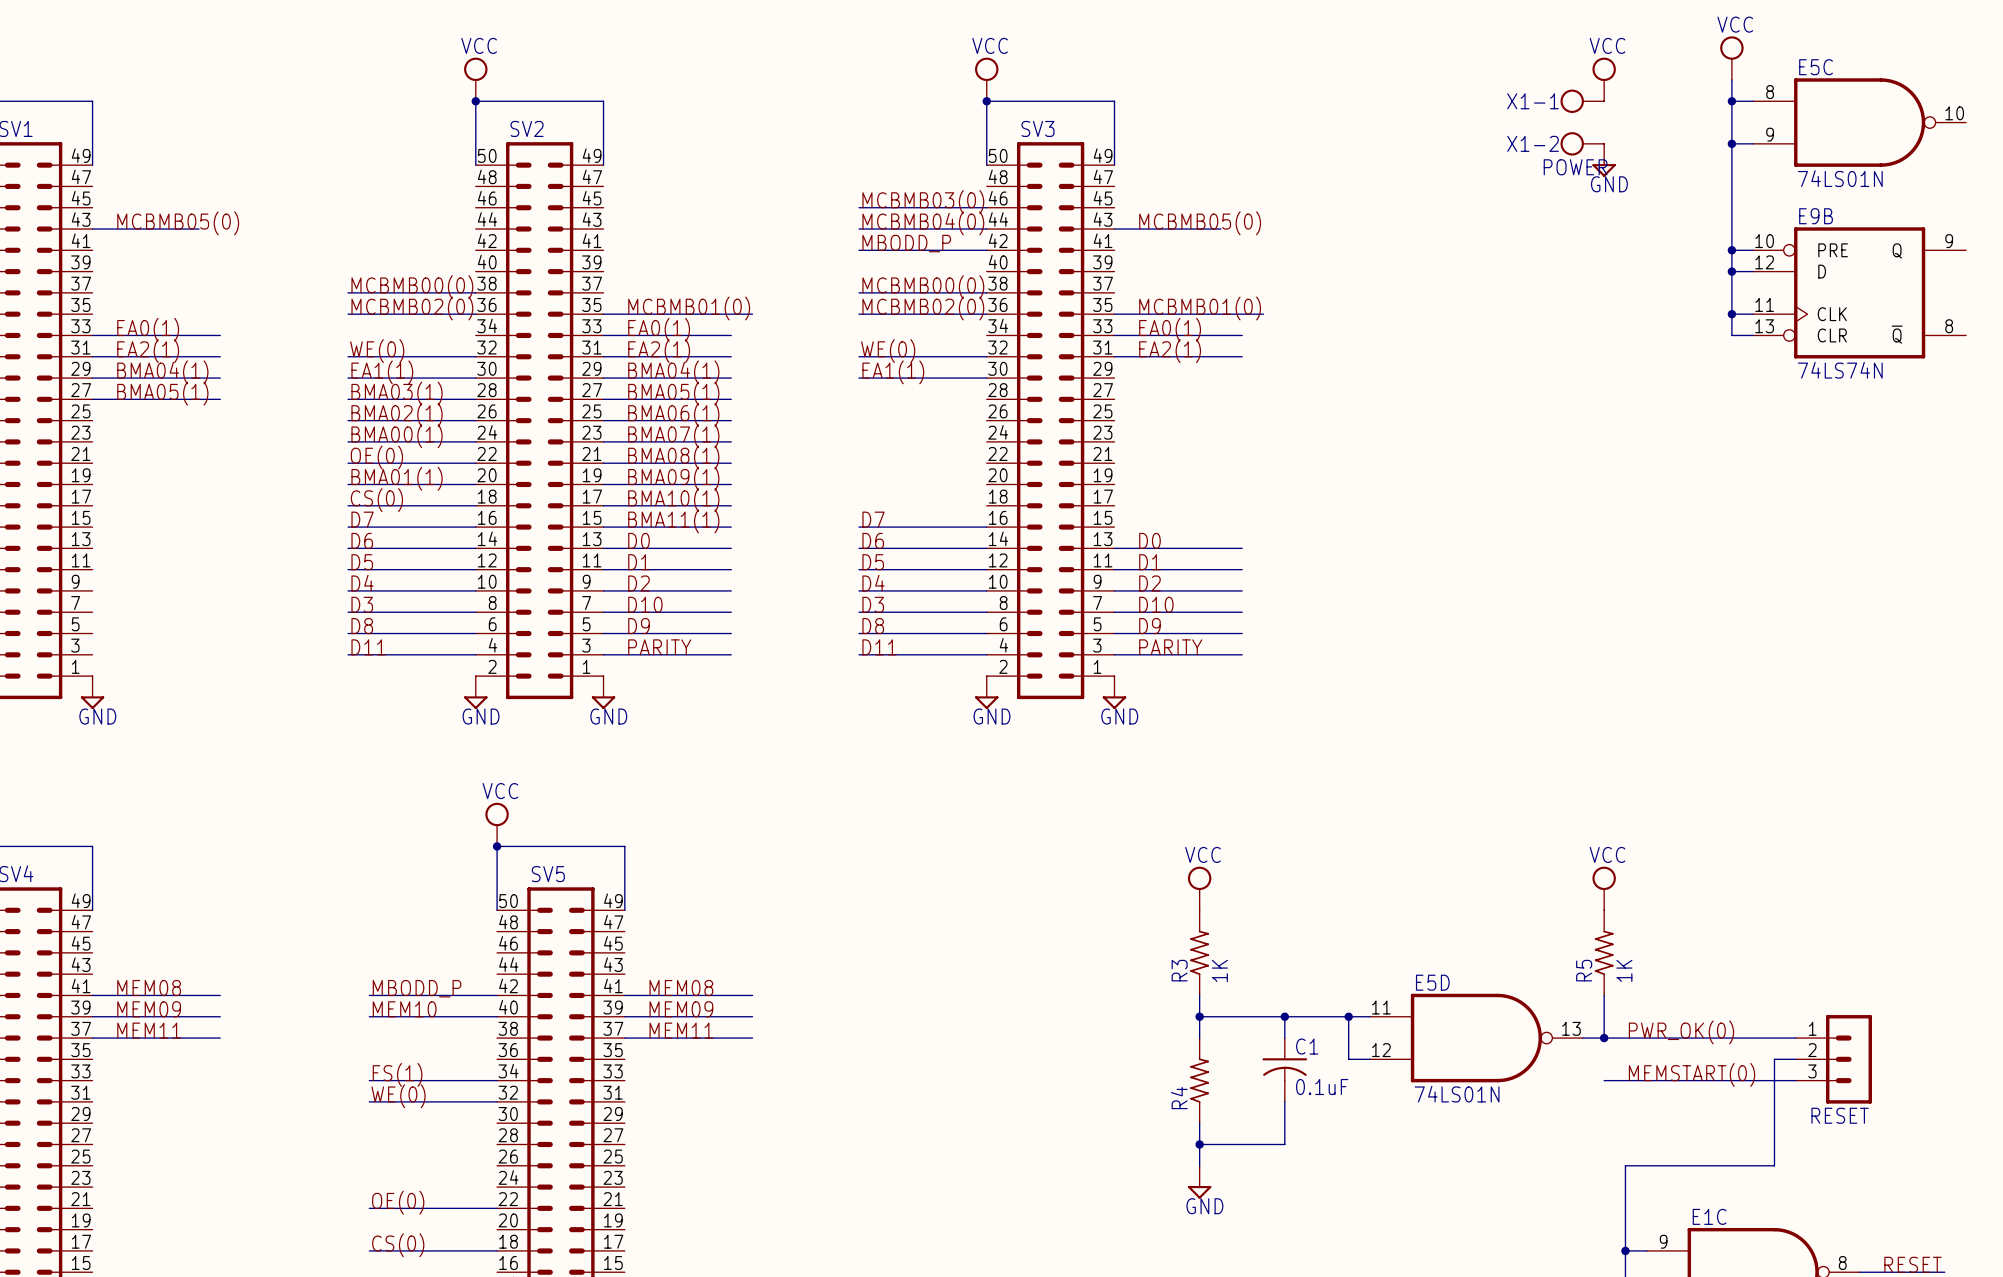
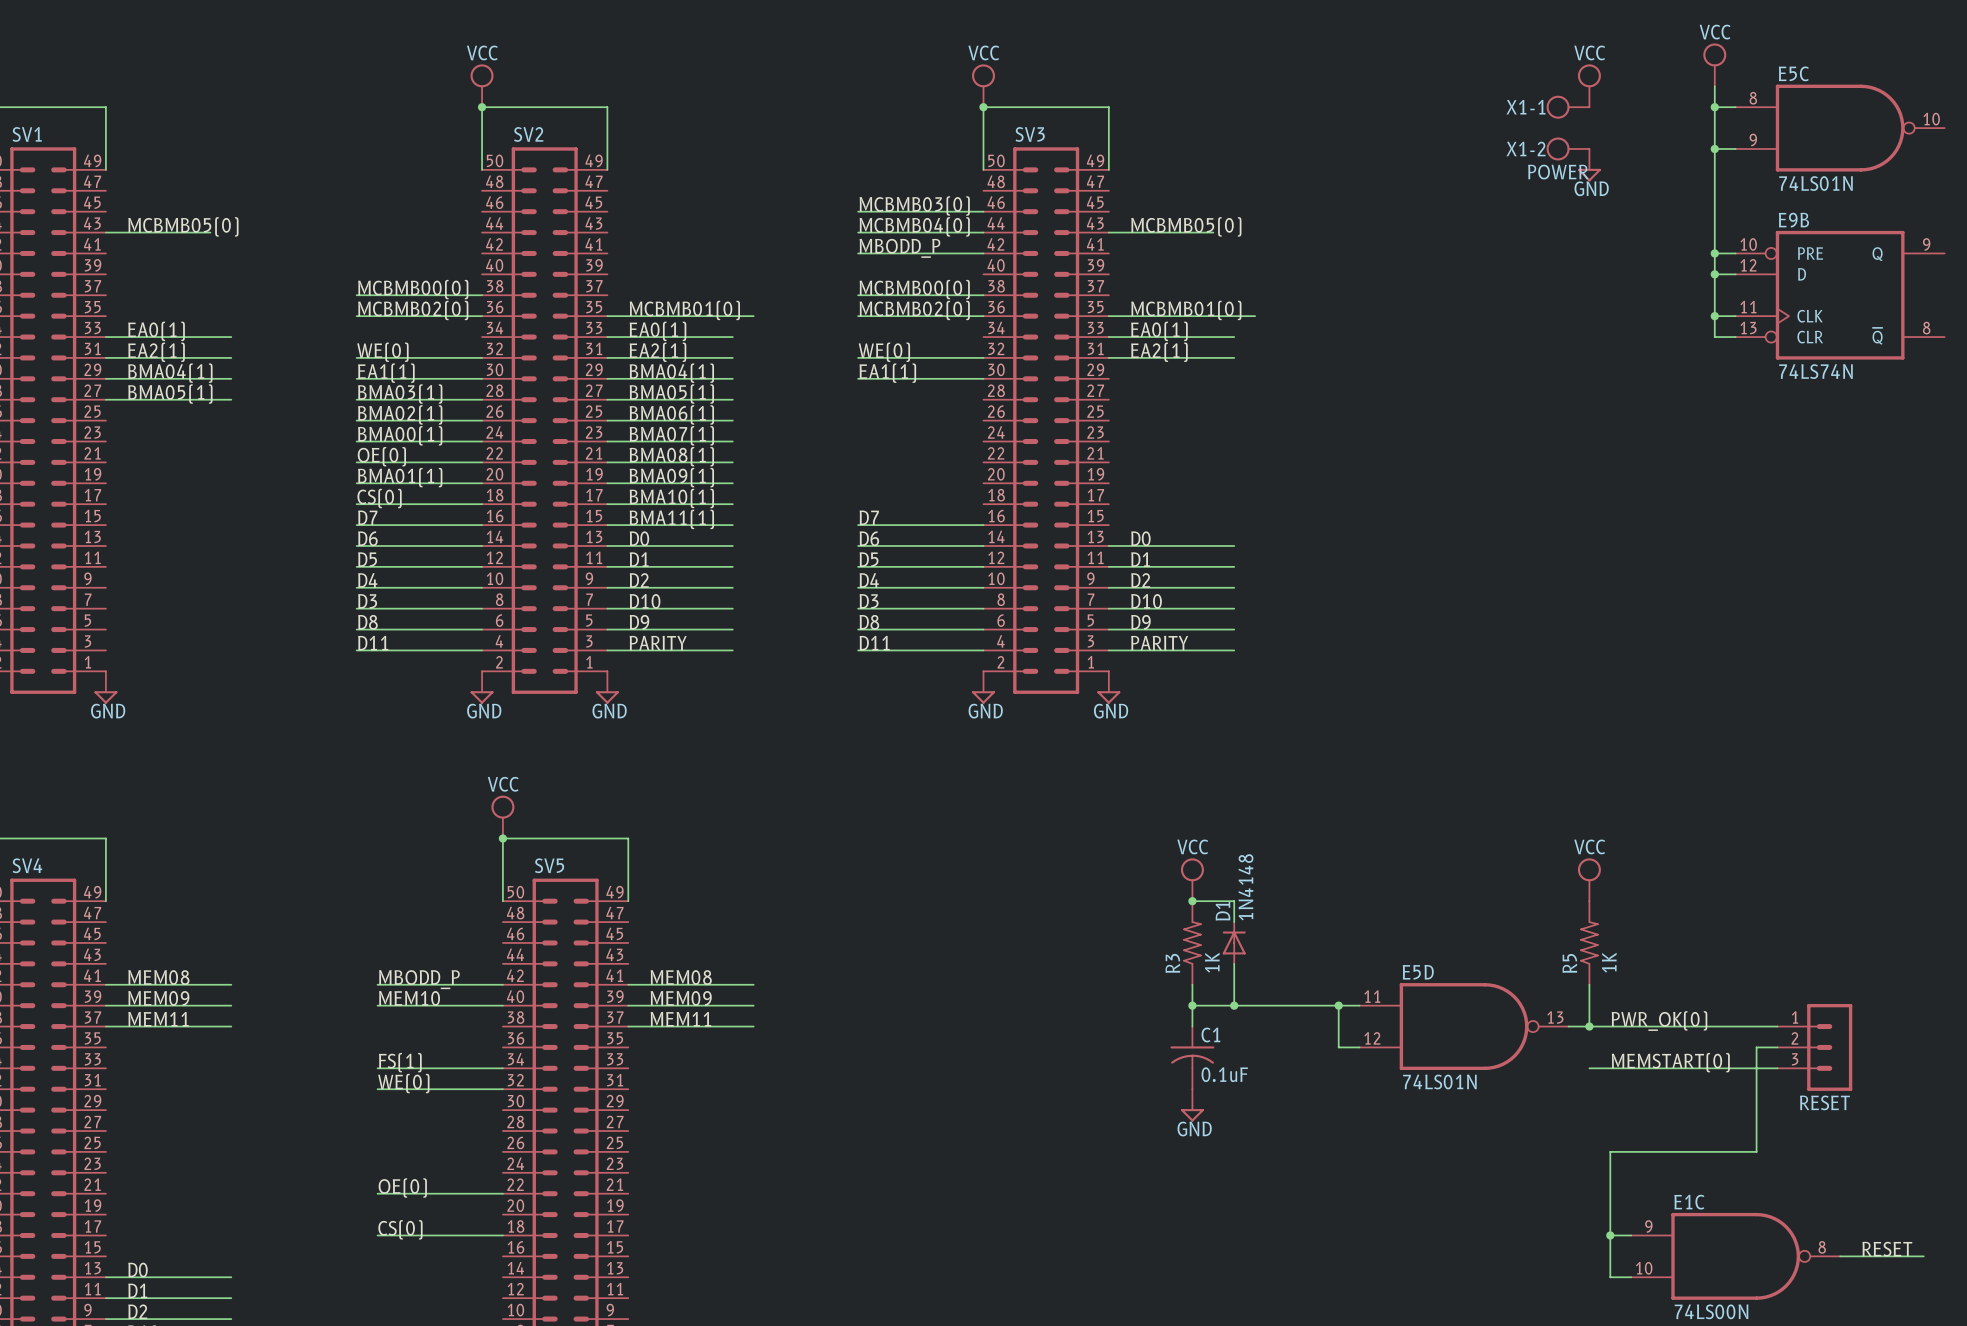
wire: none -> (1192, 901) (1234, 901) (1234, 922)
junction: none -> (1192, 901)
D1: none -> 1N4148 (1234, 942)
wire: (1284, 1016) (1284, 1038) -> none
junction position: (1284, 1016) -> (1234, 1005)
C1 position: (1284, 1069) -> (1192, 1057)
R4: (1199, 1080) -> none
wire: (1284, 1101) (1284, 1144) (1199, 1144) -> none
wire: (1199, 1123) (1199, 1165) -> (1234, 963) (1234, 1005)
junction: (1199, 1144) -> none
power symbol position: GND (1199, 1182) -> GND (1192, 1105)

